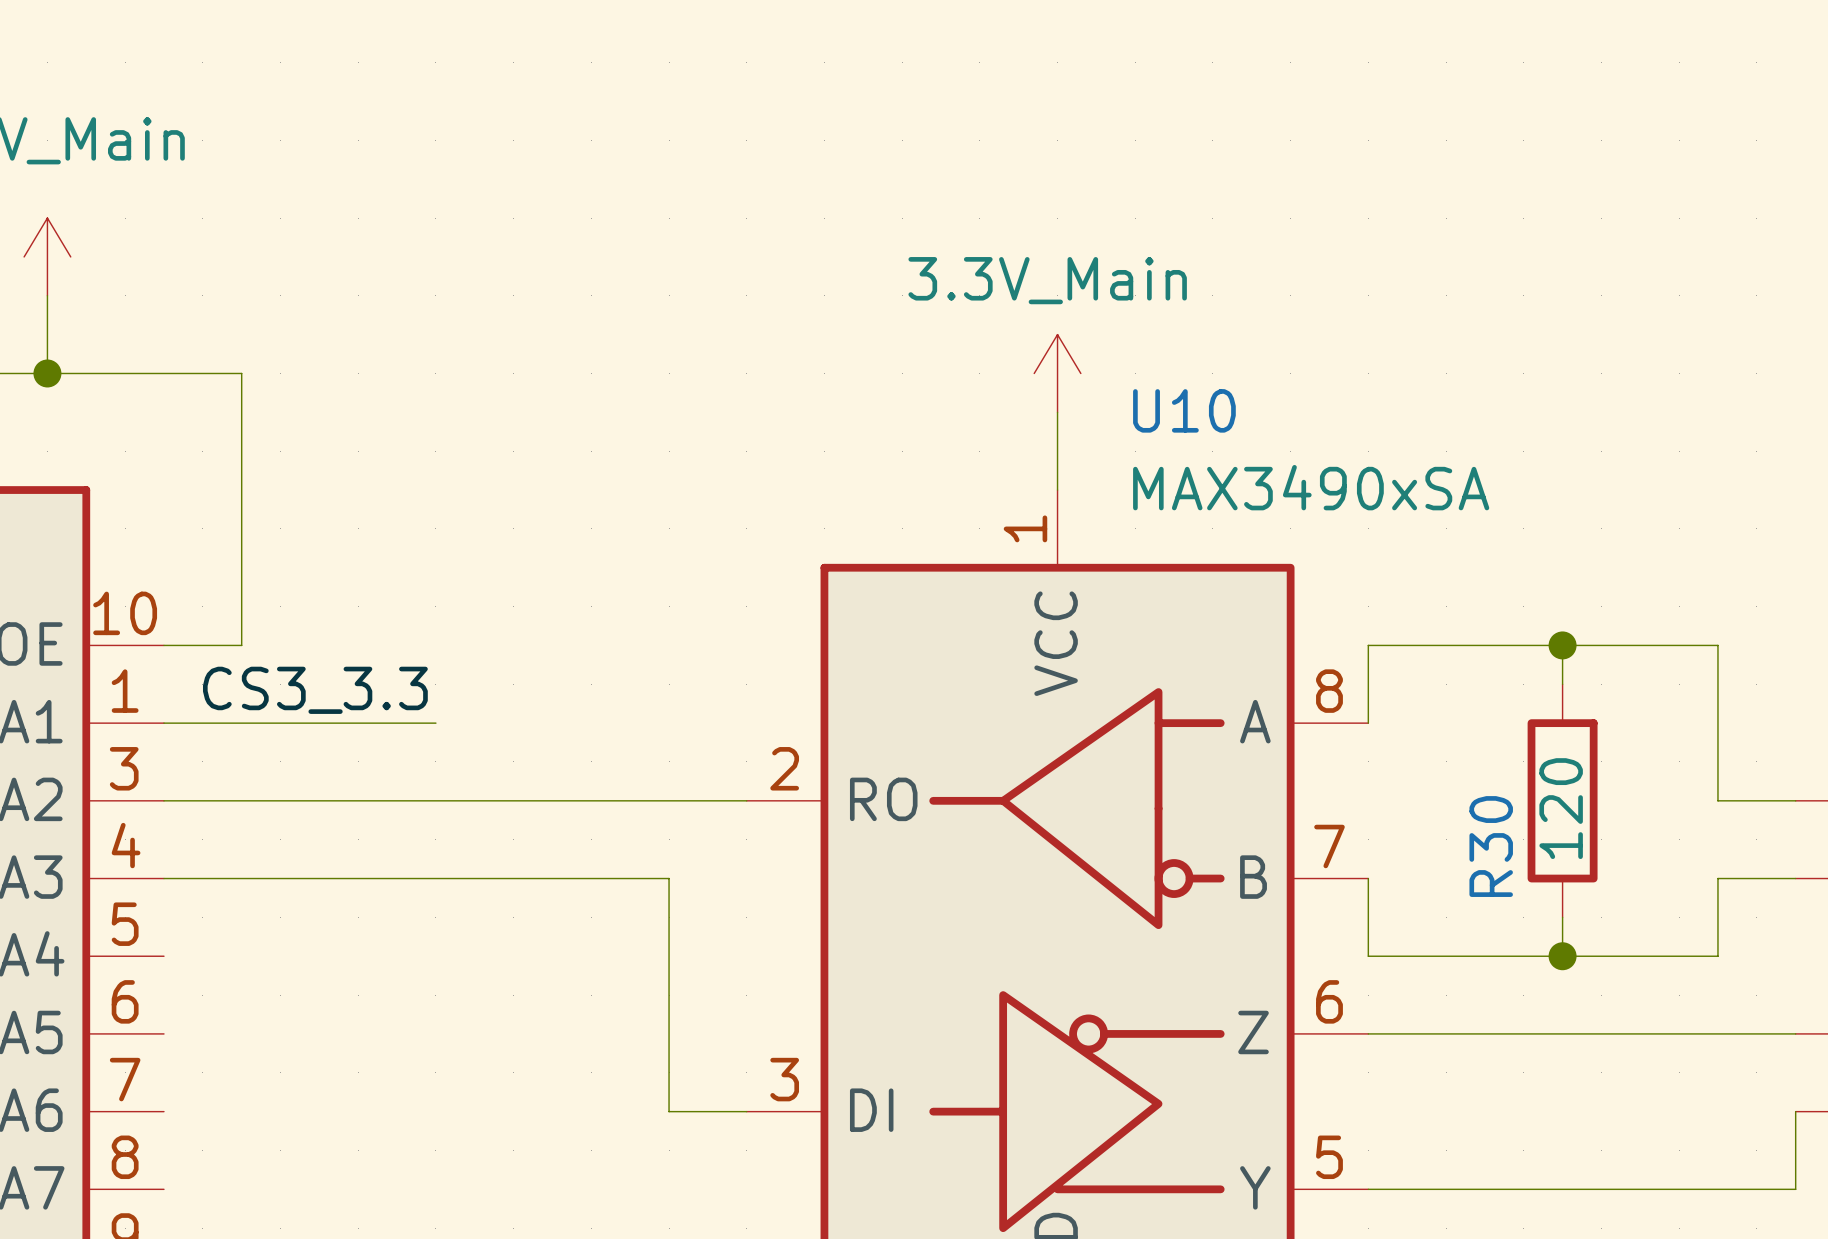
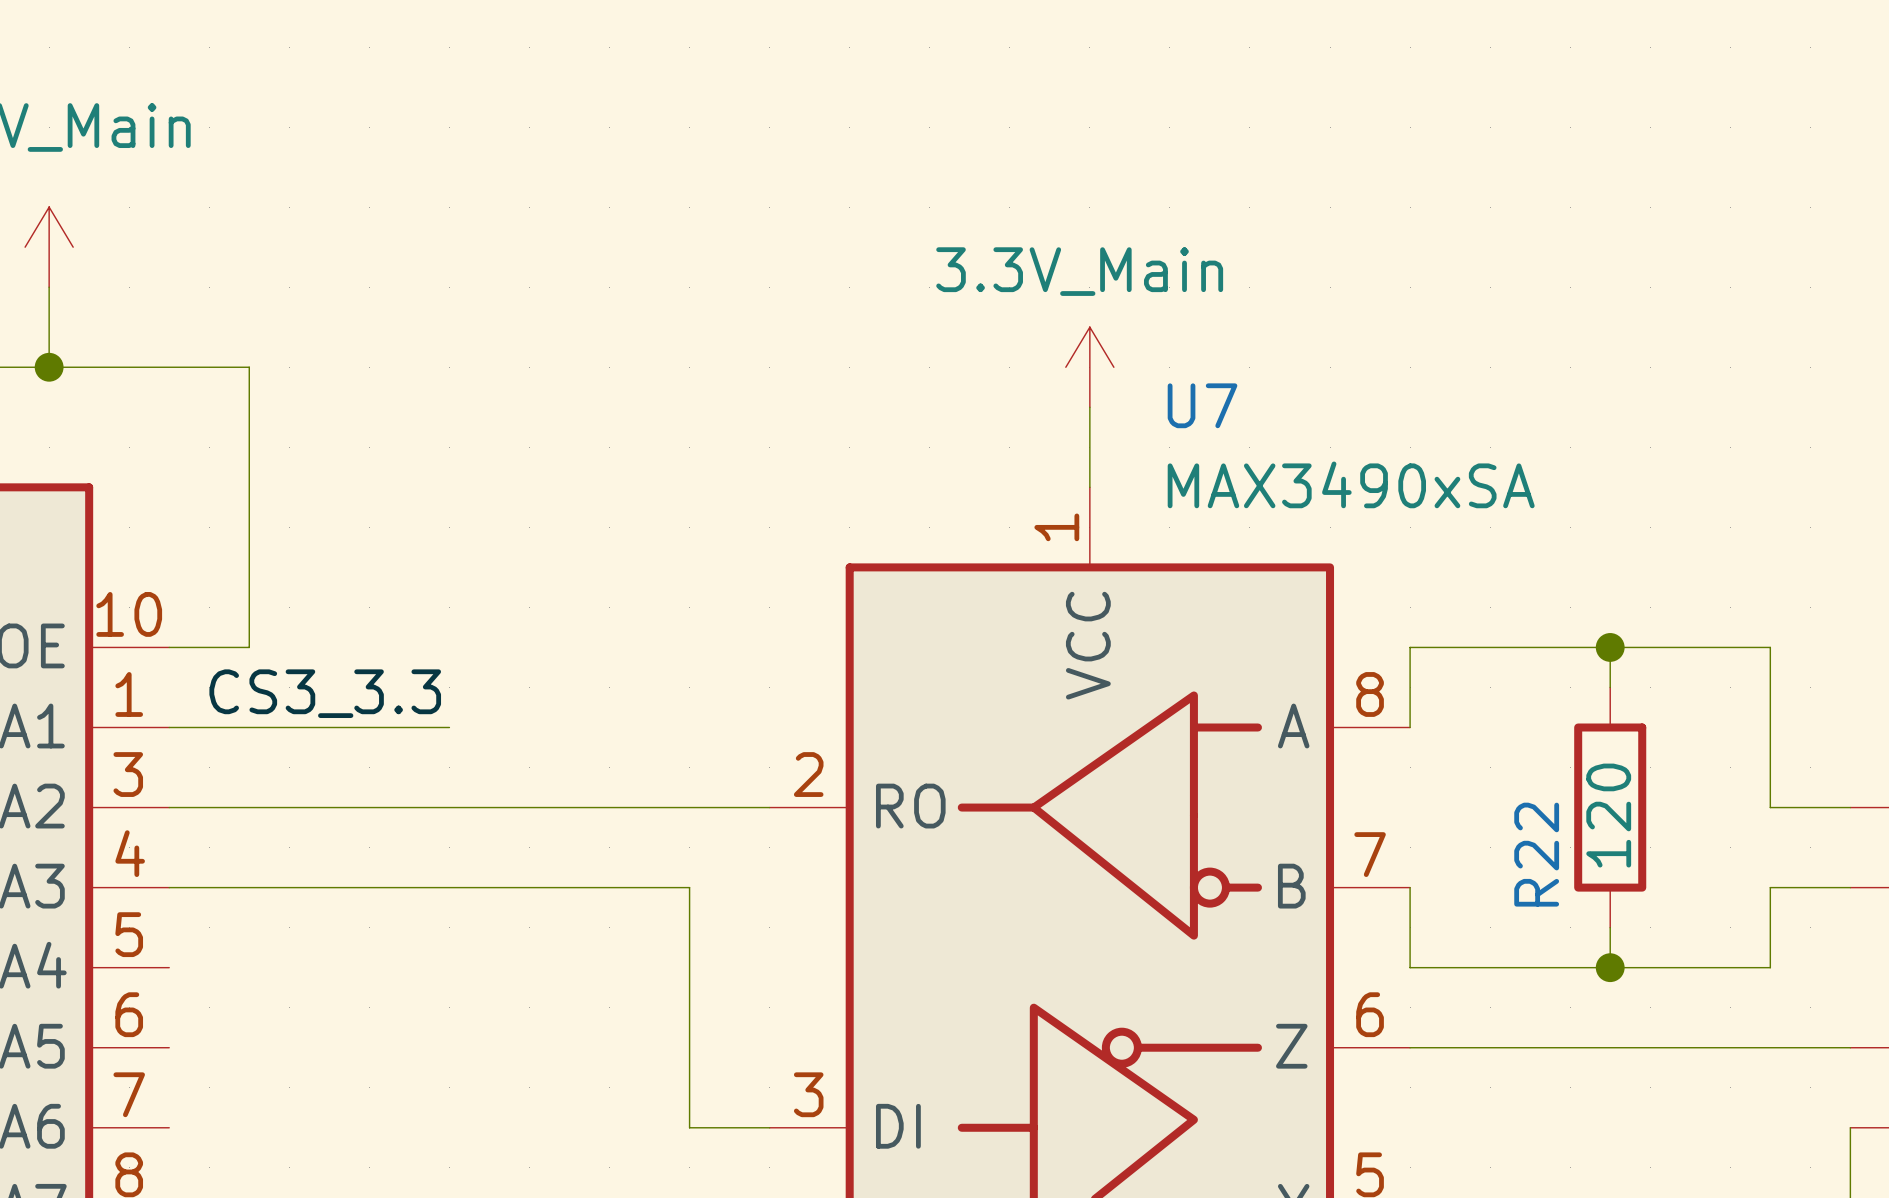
U10 name: U10 (1184, 410) -> U7 (1202, 405)
R30 name: R30 (1491, 846) -> R22 (1536, 854)

